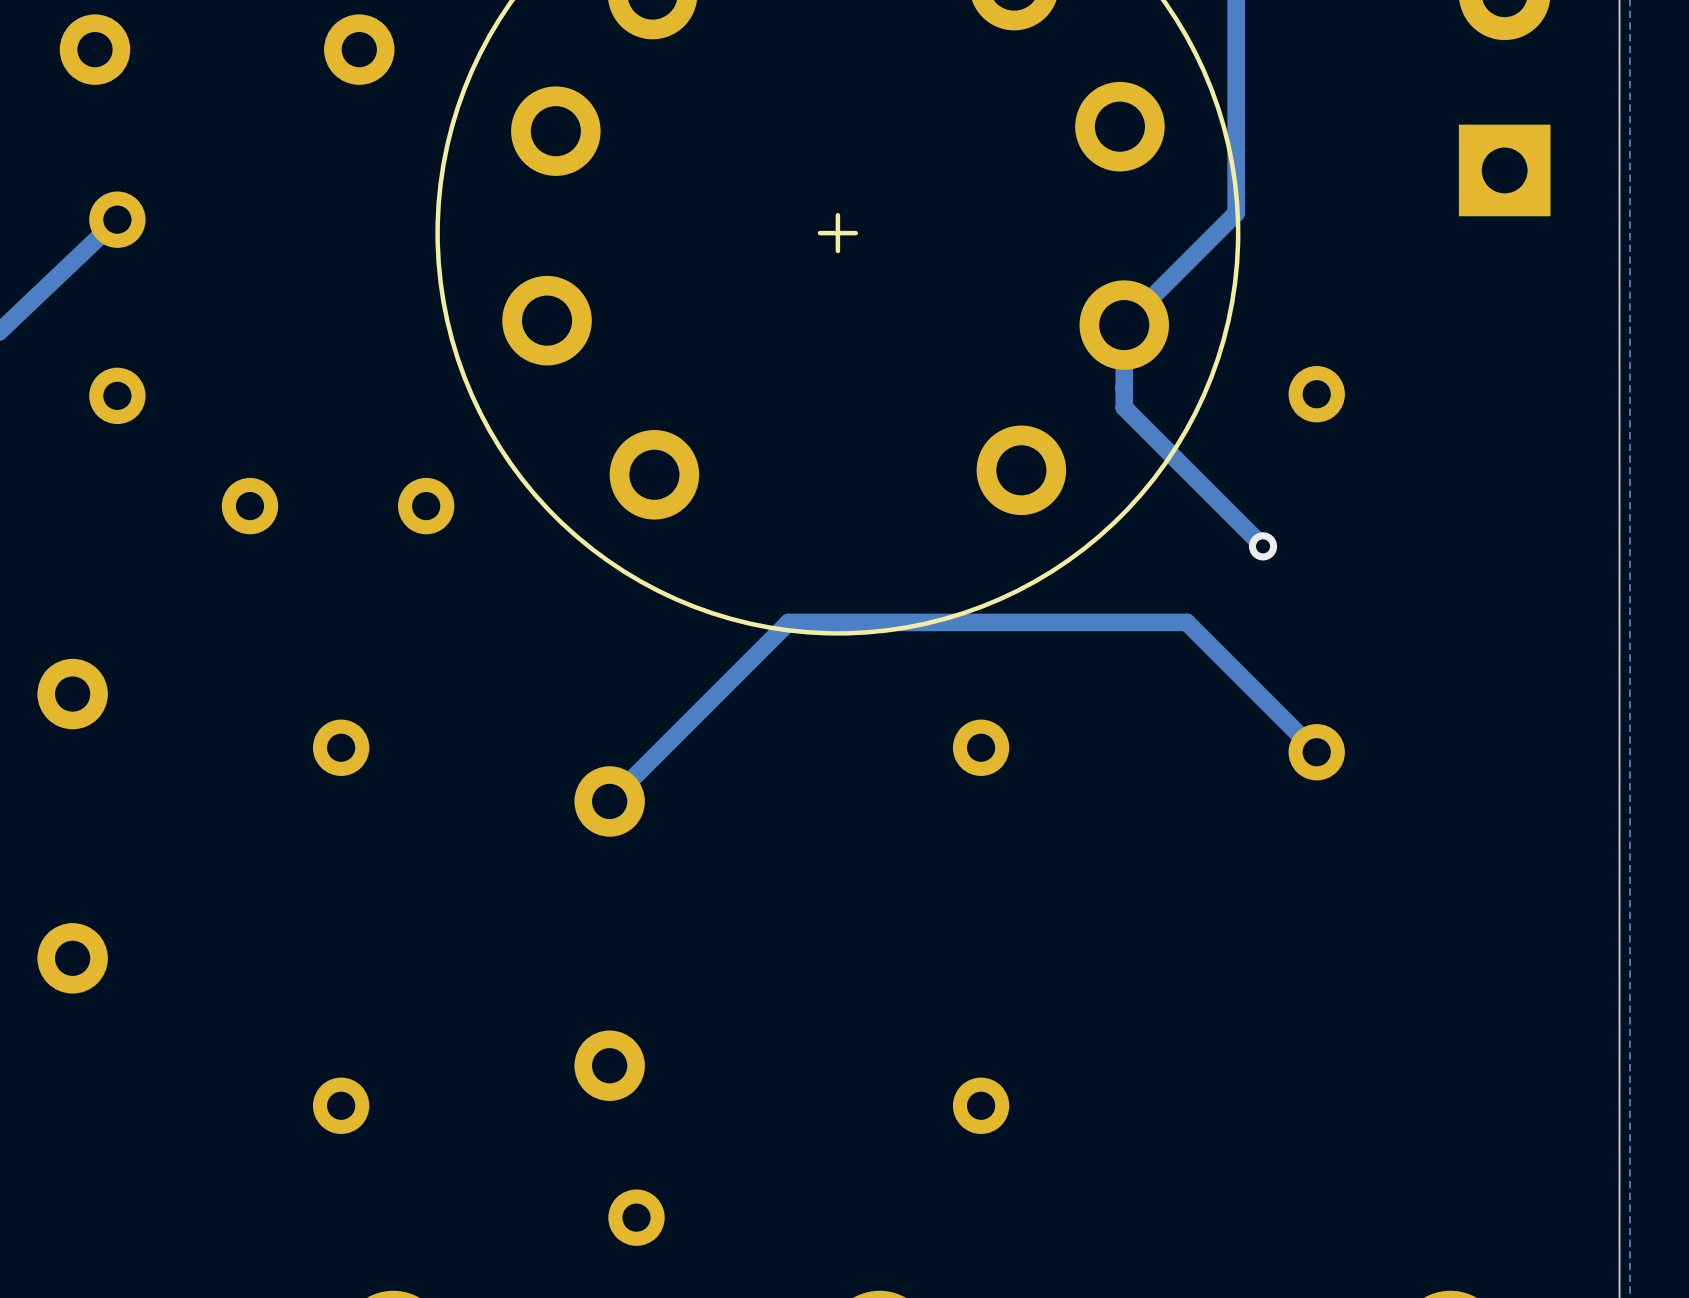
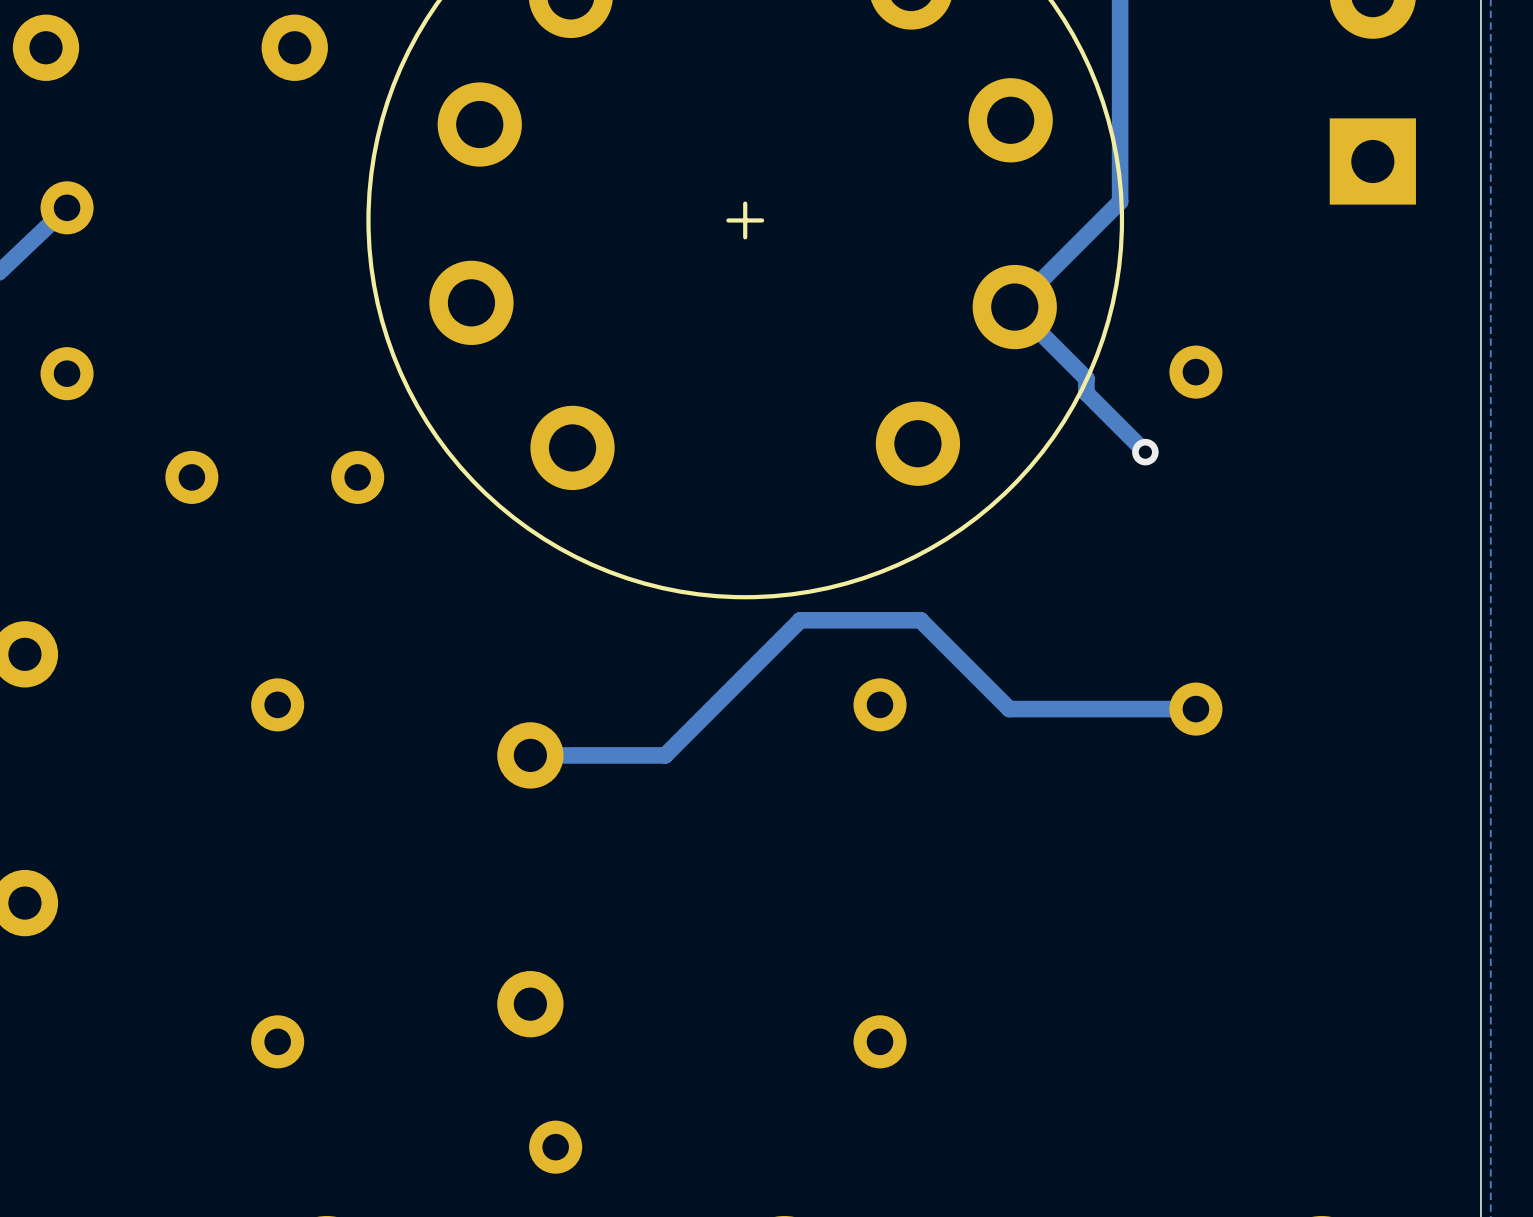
track: none -> (1014, 307) (1086, 378) (1086, 393) (1145, 452)
track: (1124, 335) (1124, 407) (1263, 546) -> none
via position: (1263, 546) -> (1145, 452)
track: (1316, 752) (1186, 622) (788, 622) (609, 801) -> (1195, 709) (1009, 709) (920, 620) (800, 620) (665, 755) (530, 755)

